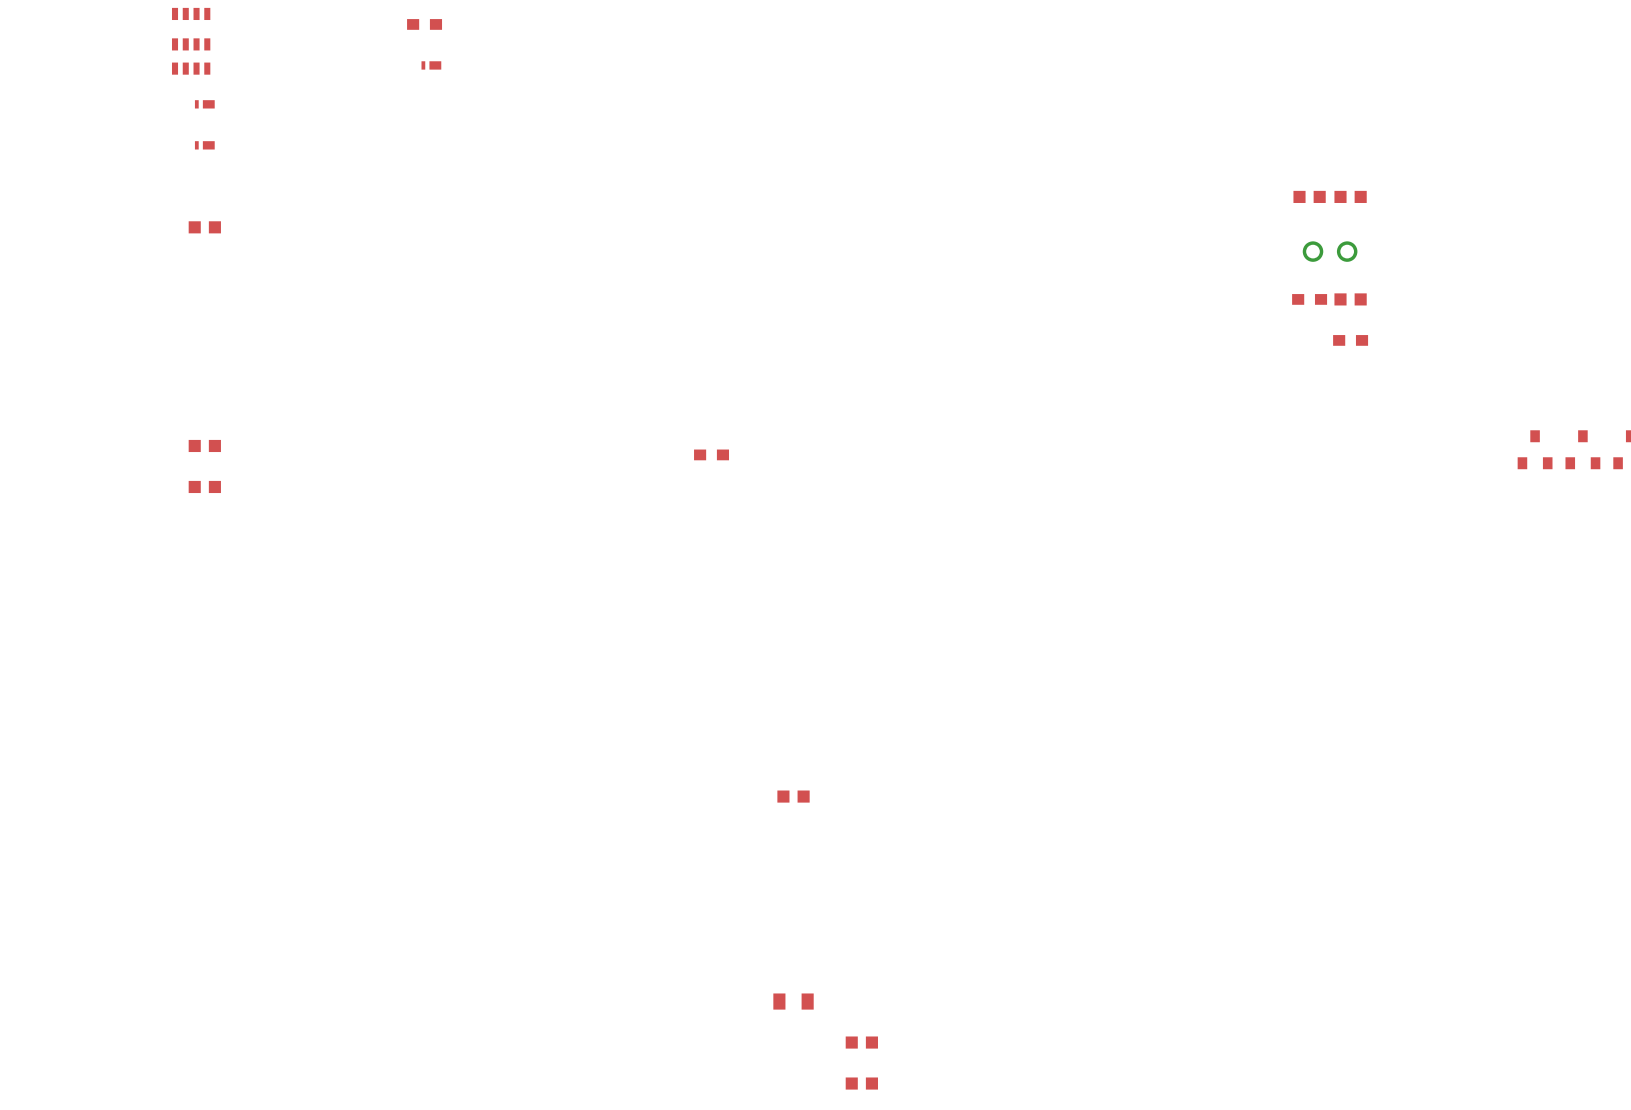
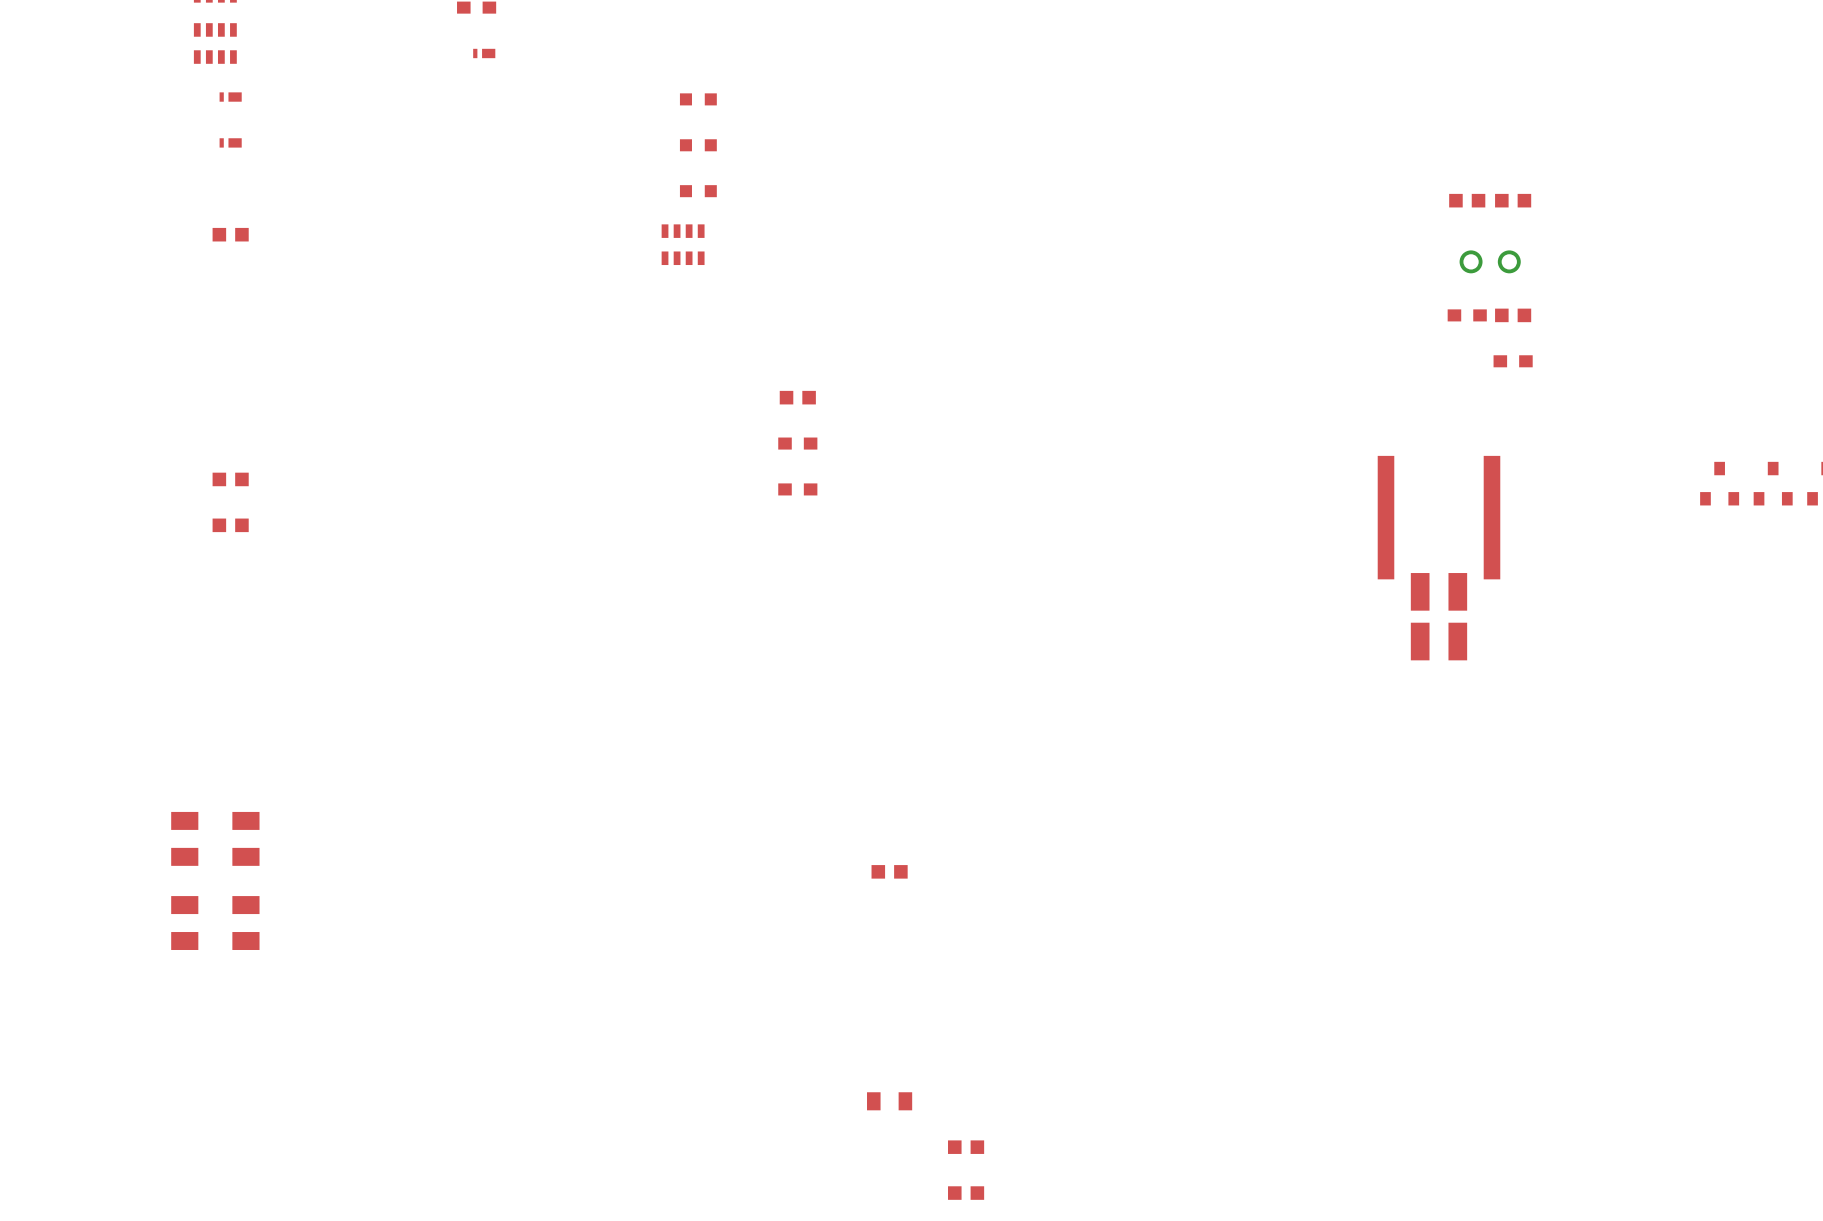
part: none -> (698, 99)
part: none -> (698, 145)
part: none -> (698, 191)
part: none -> (683, 244)
part: none -> (797, 397)
part: none -> (797, 443)
part: none -> (1438, 558)
part: none -> (215, 838)
part: none -> (215, 923)

